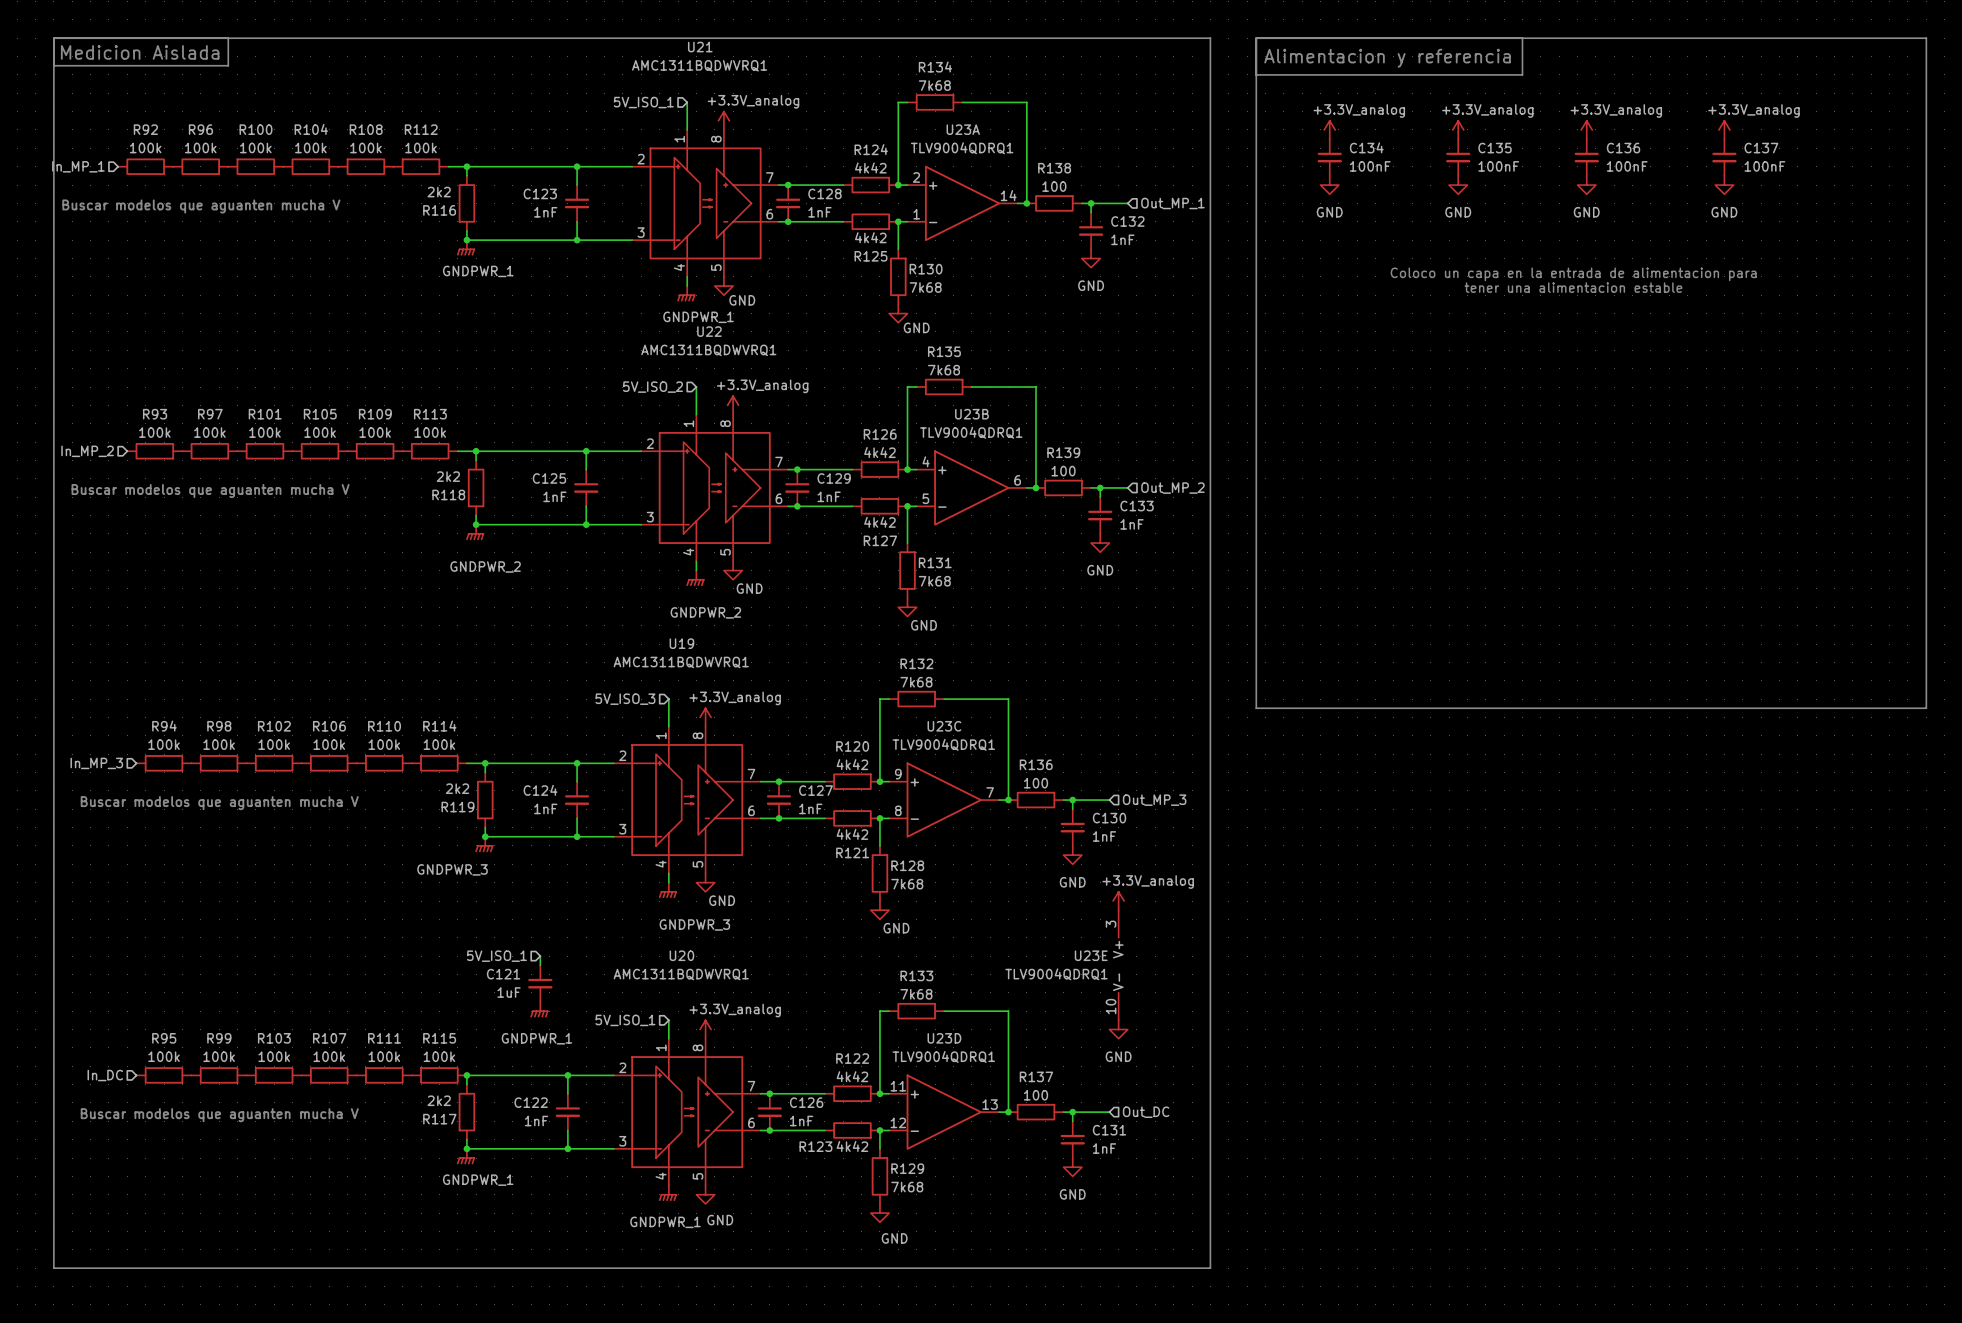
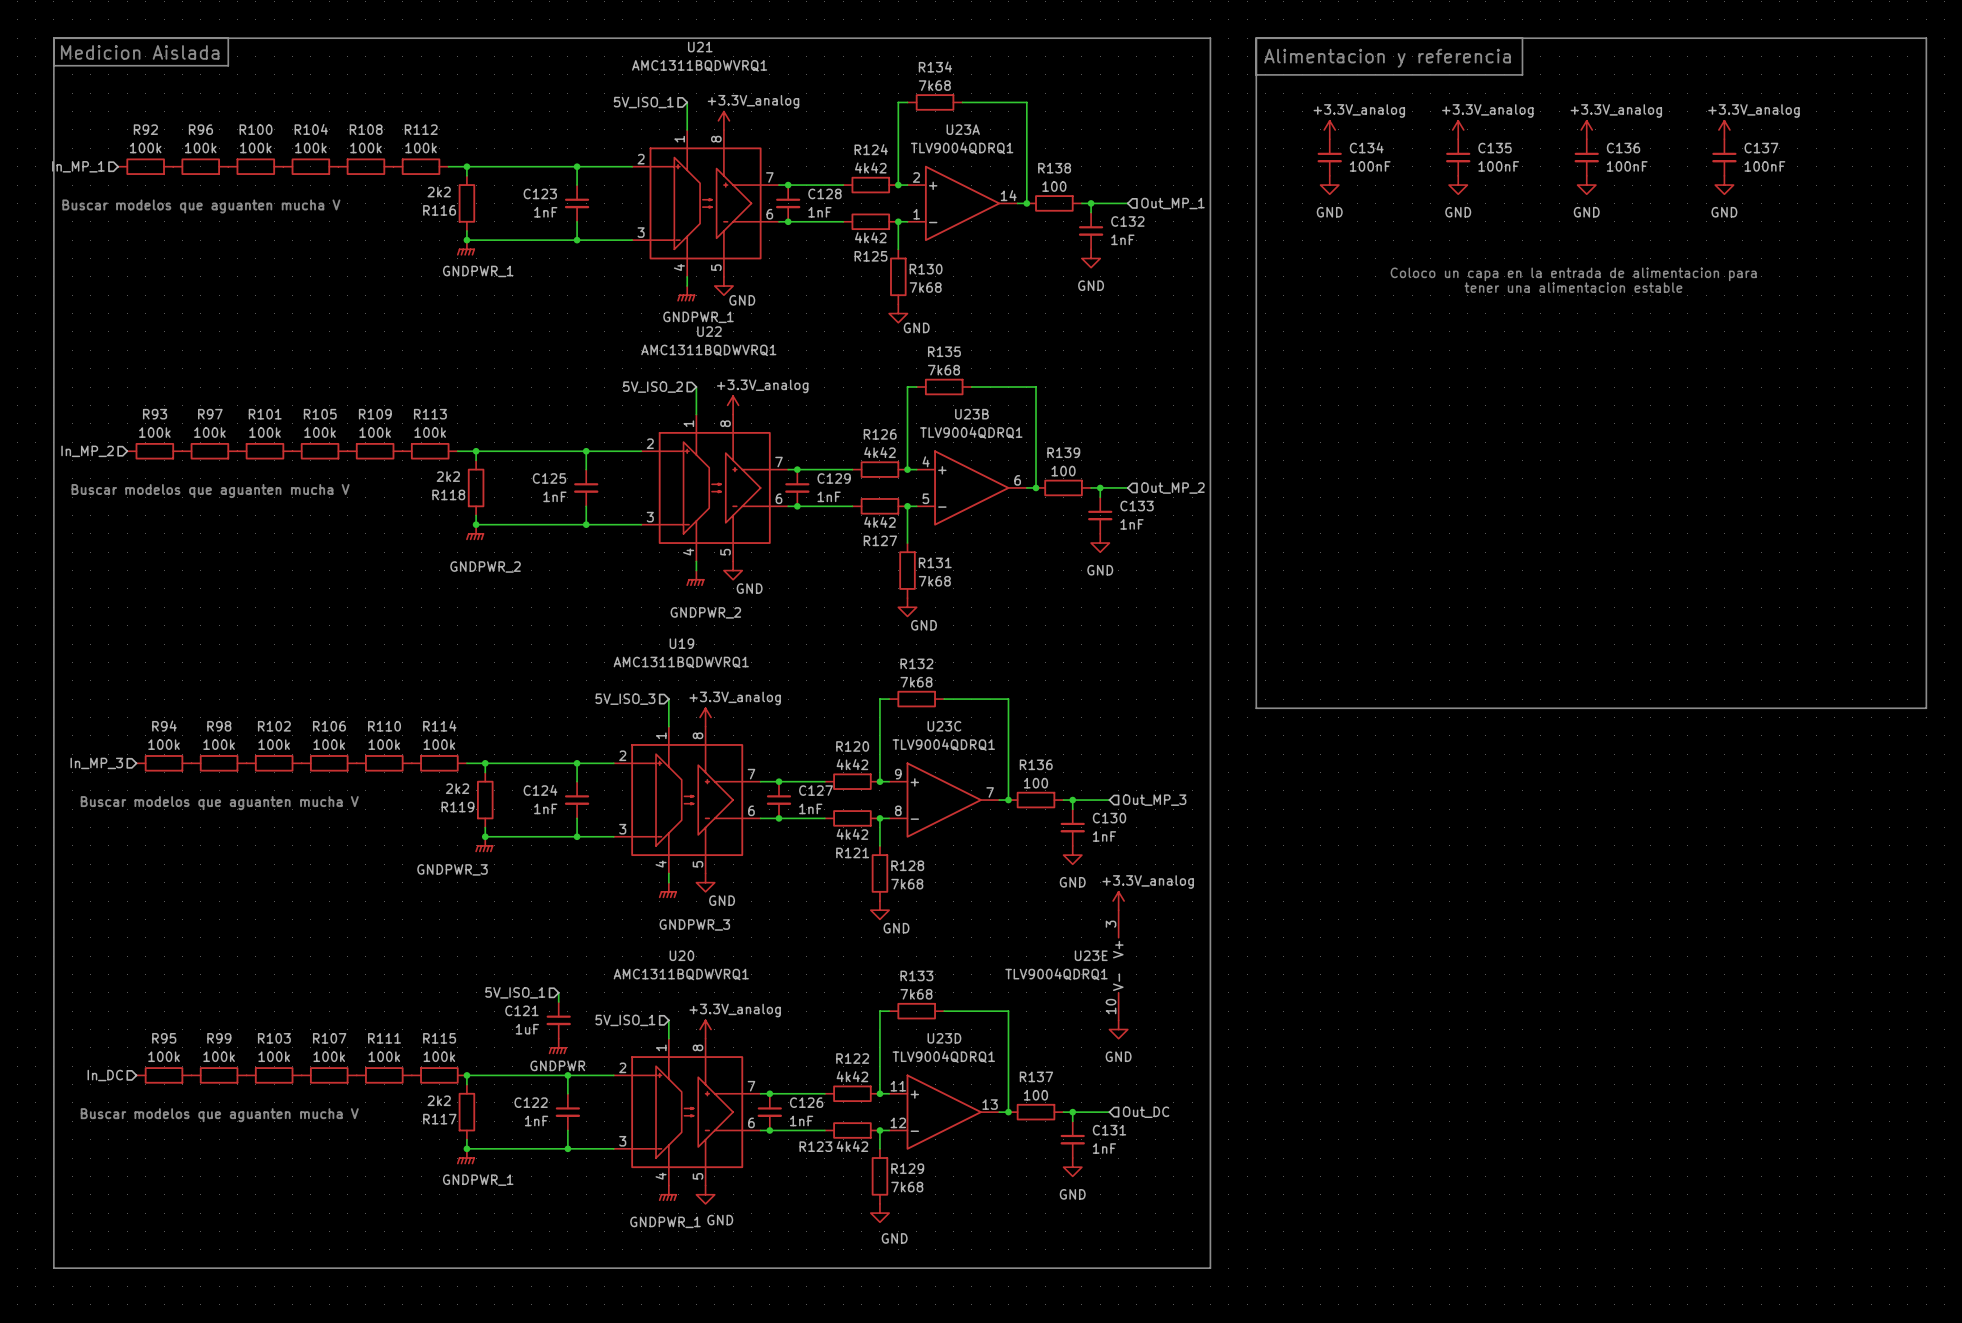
hierarchical label position: 5V_ISO_1 (496, 956) -> 5V_ISO_1 (515, 992)
wire: (540, 956) (540, 965) -> (558, 992) (558, 1001)
C121 position: (540, 983) -> (558, 1020)
power symbol: GNDPWR_1 (539, 1009) -> none
power symbol: none -> GNDPWR (557, 1046)

